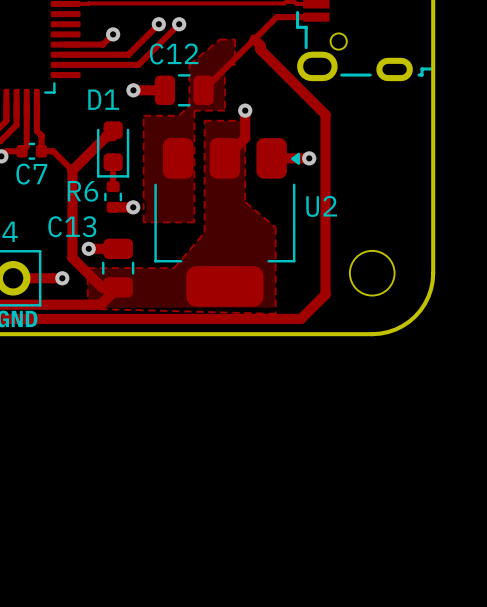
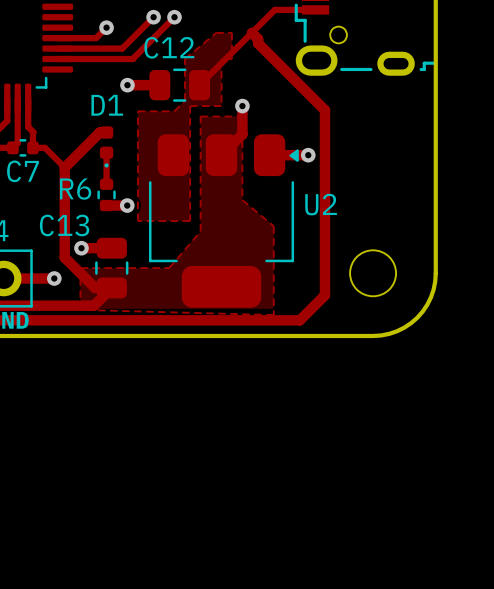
D1 footprint: [96, 121, 130, 178] -> [99, 126, 114, 168]

